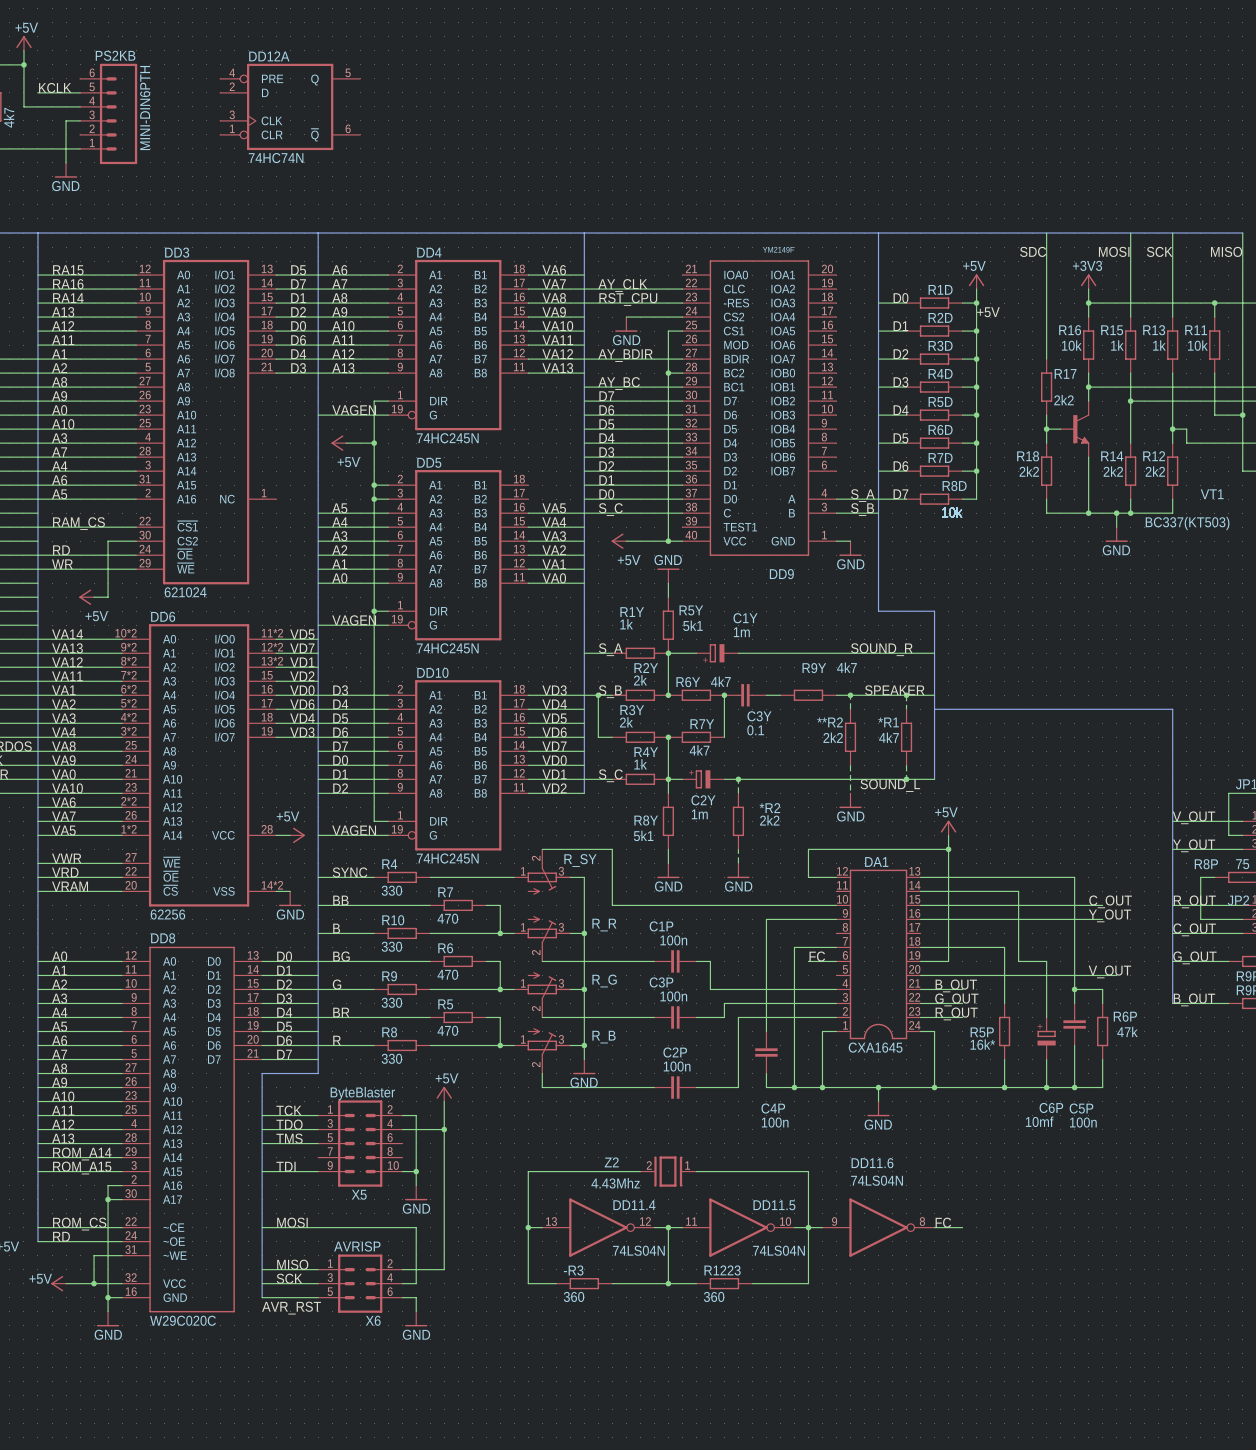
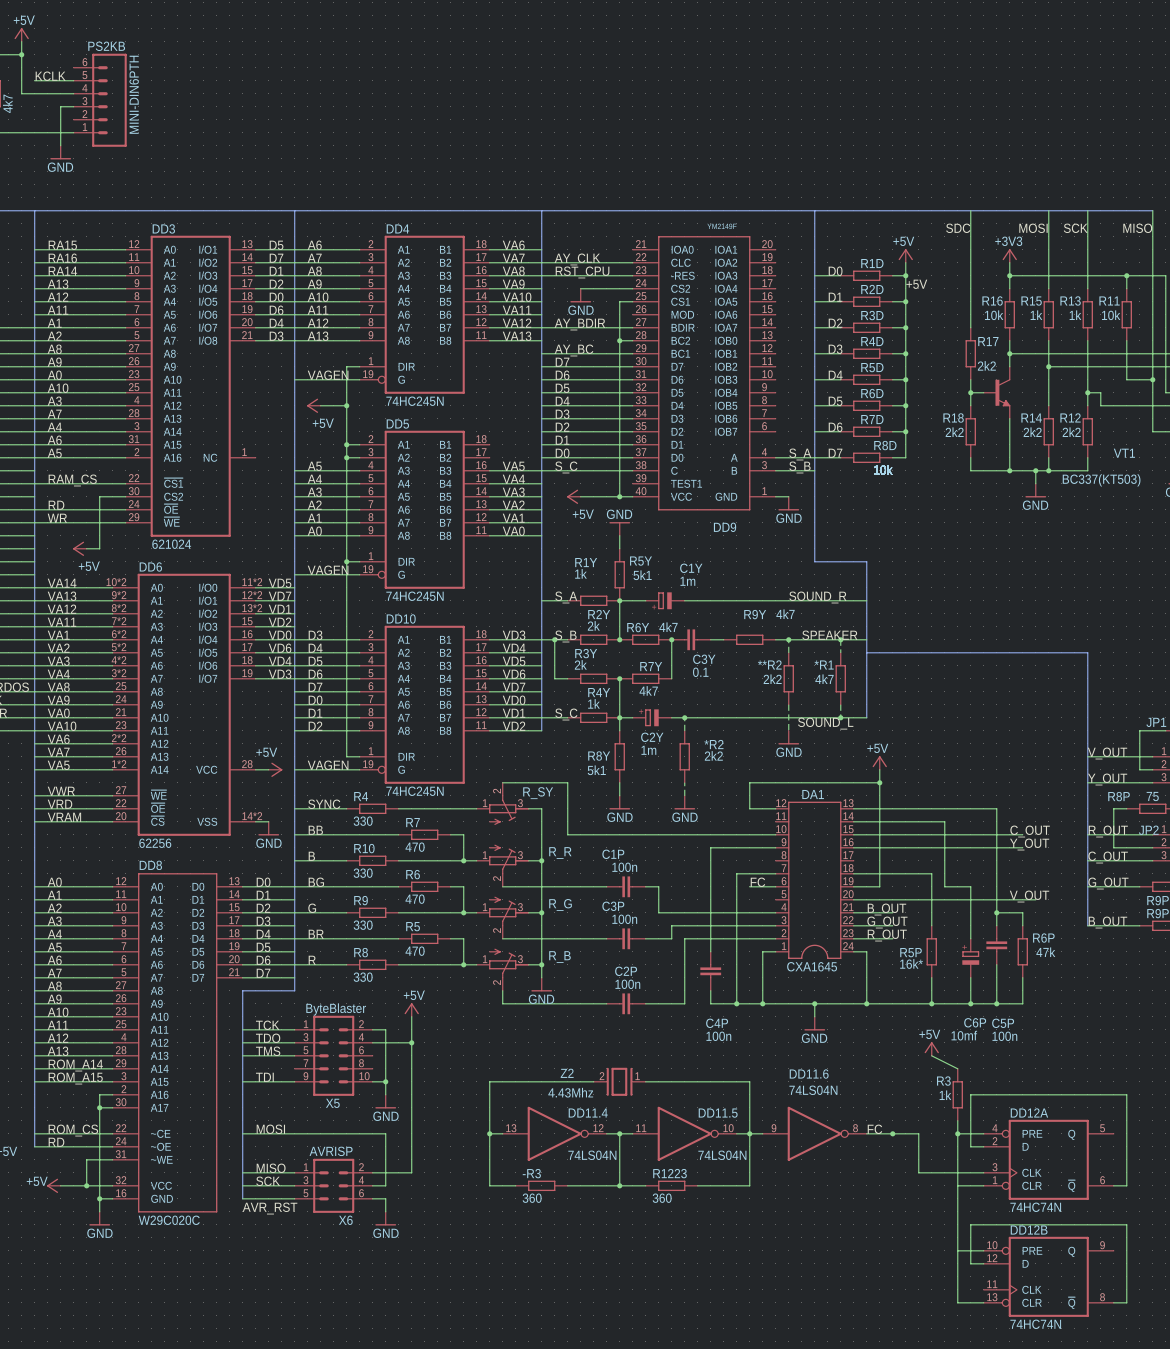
DD12A position: (290, 106) -> (1048, 1159)
power symbol: none -> +5V (931, 1049)
wire: none -> (931, 1055) (957, 1068)
R3: none -> 1k (957, 1094)
wire: none -> (957, 1120) (957, 1302) (983, 1302)
wire: none -> (892, 1133) (918, 1133) (918, 1172) (983, 1172)
junction: none -> (892, 1133)
wire: none -> (957, 1133) (983, 1133)
junction: none -> (957, 1133)
wire: none -> (983, 1146) (970, 1146) (970, 1094) (1126, 1094) (1126, 1185) (1113, 1185)
wire: none -> (957, 1185) (983, 1185)
wire: none -> (957, 1250) (983, 1250)
wire: none -> (983, 1263) (970, 1263) (970, 1224) (1126, 1224) (1126, 1302) (1113, 1302)
DD12B: none -> 74HC74N (1048, 1276)

